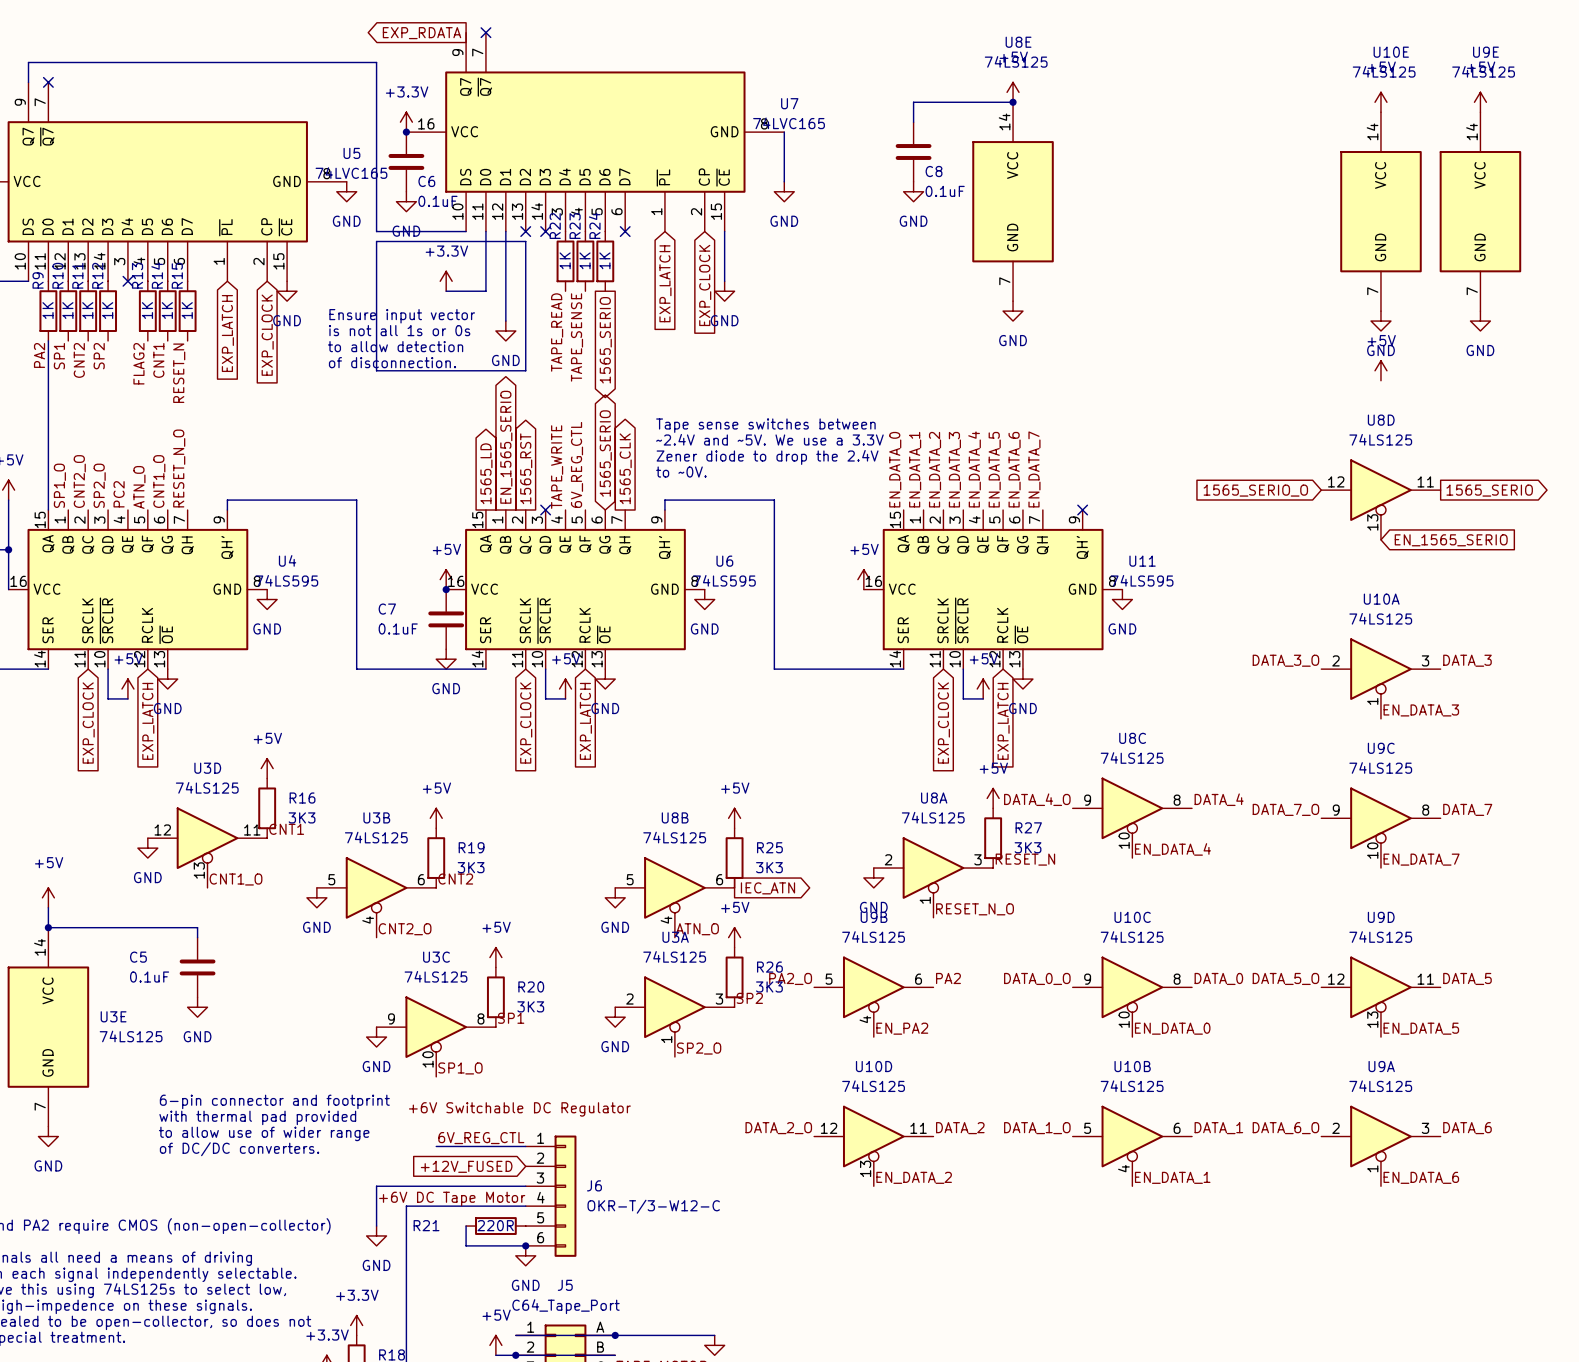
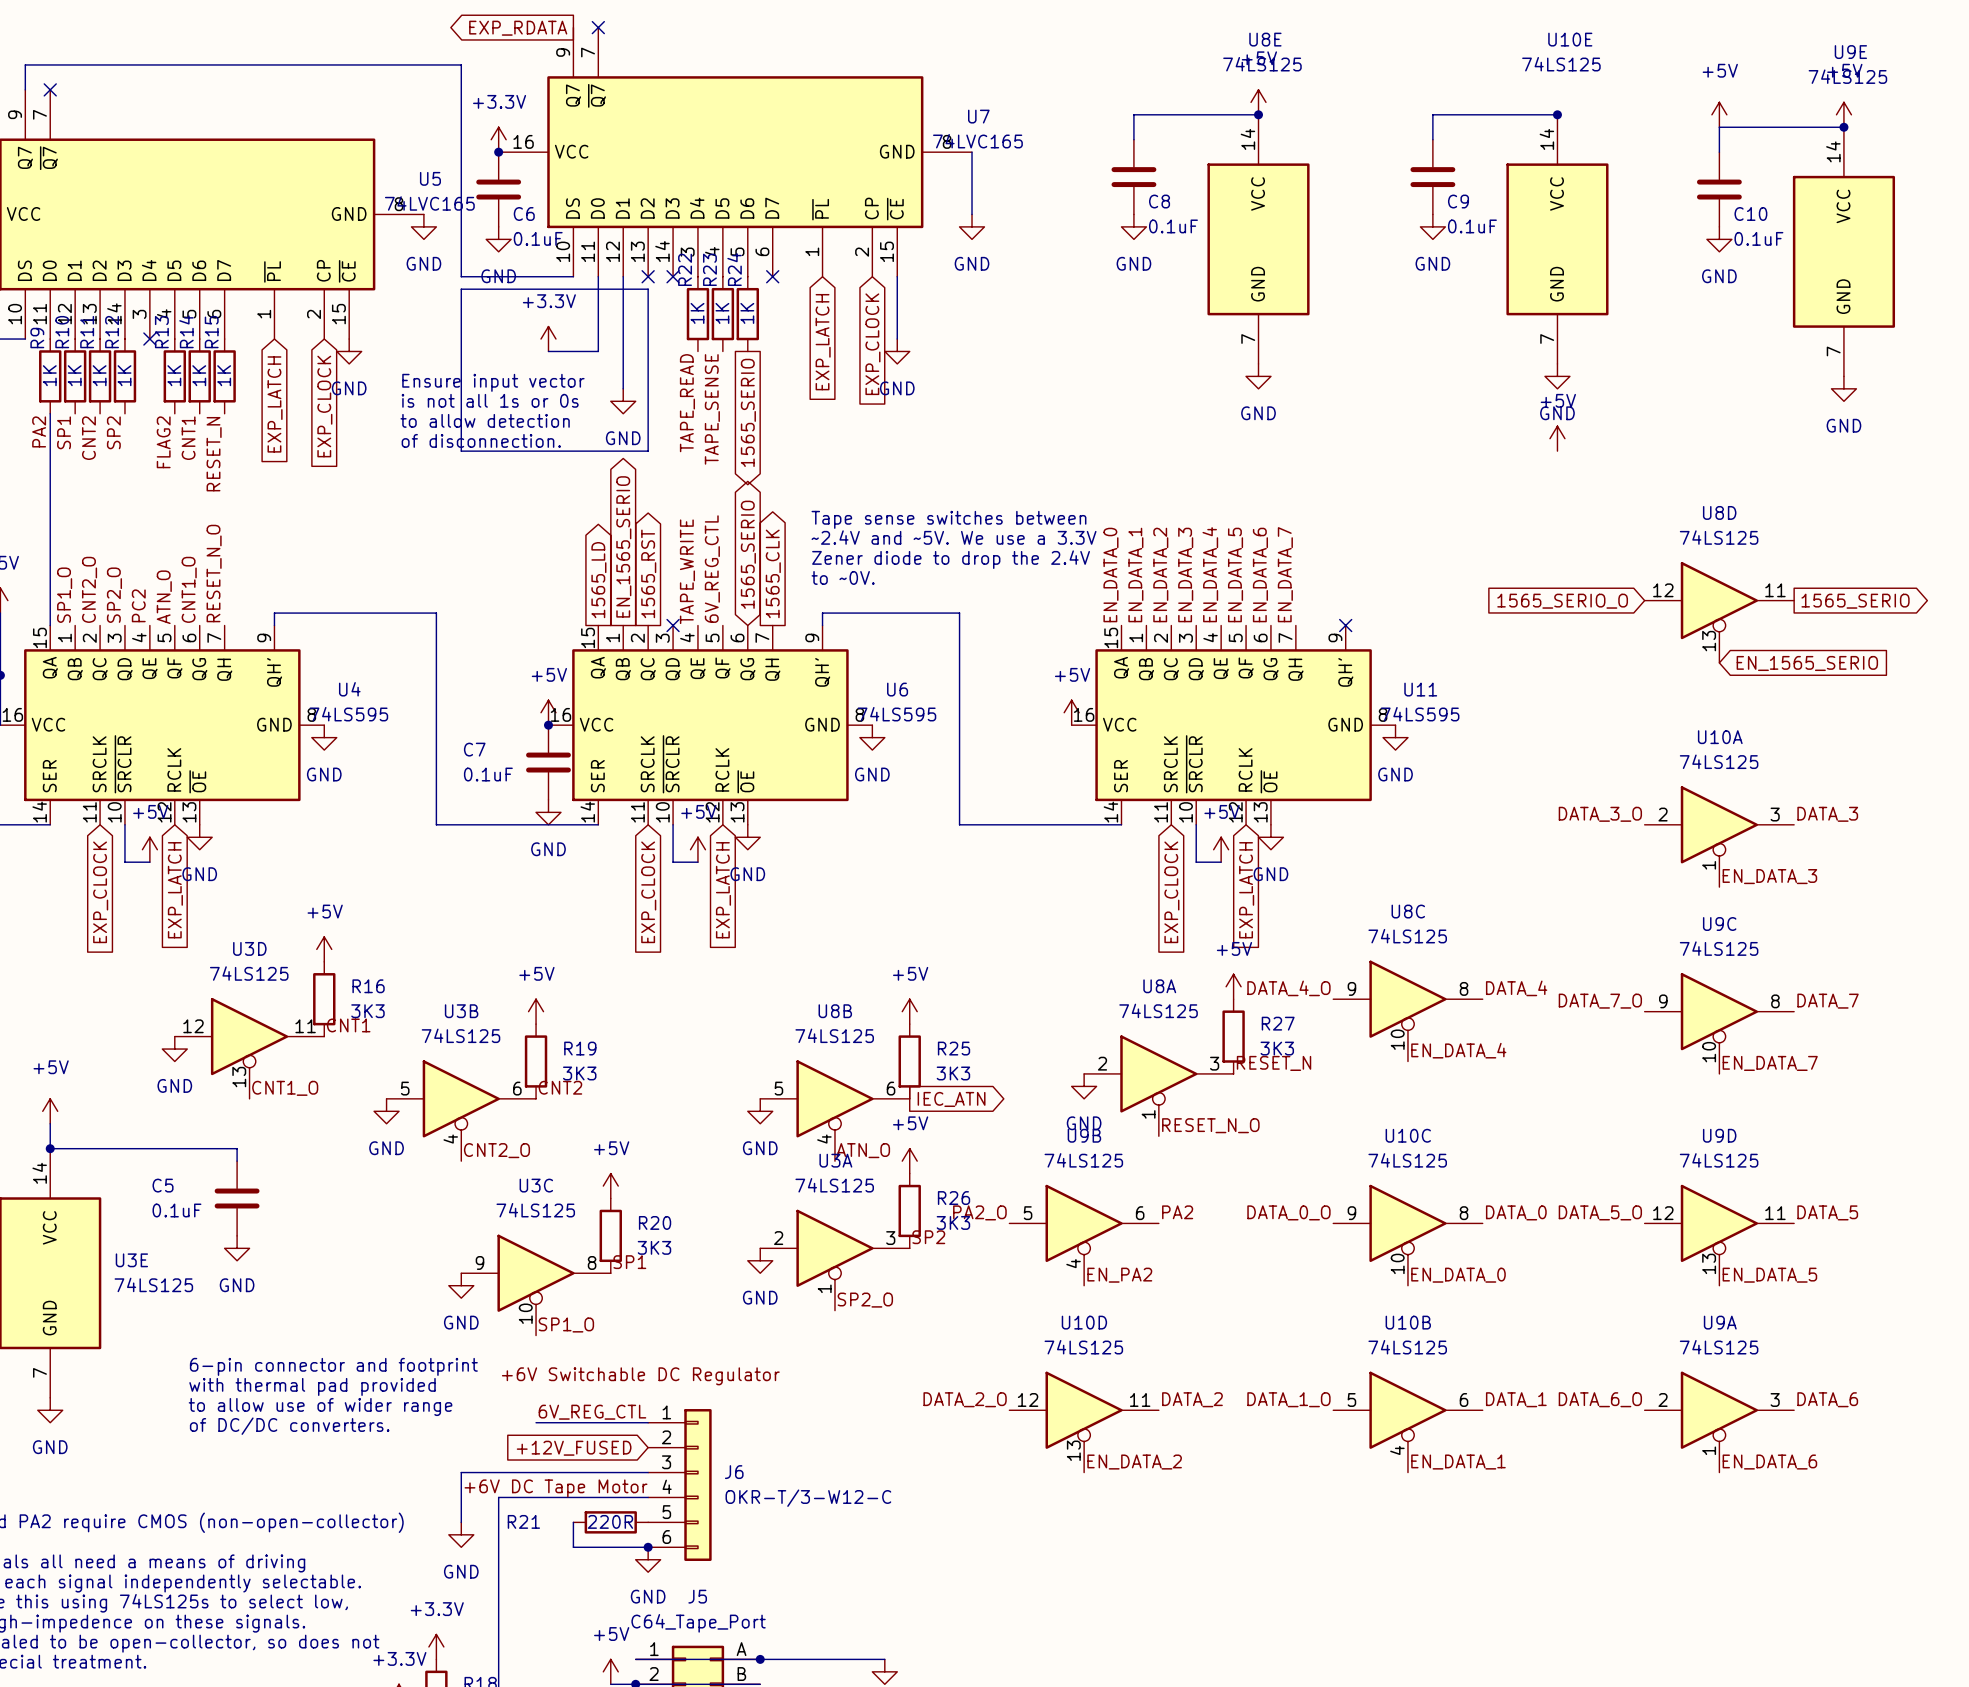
wire: none -> (1557, 114) (1432, 114) (1432, 139)
junction: none -> (1557, 114)
wire: none -> (1843, 127) (1719, 127) (1719, 152)
junction: none -> (1843, 127)
C9: none -> 0.1uF (1432, 177)
C10: none -> 0.1uF (1719, 189)
power symbol: none -> GND (1432, 226)
power symbol: none -> GND (1719, 239)
U10E position: (1380, 211) -> (1557, 239)
power symbol: none -> GND (1557, 376)
power symbol: GND (1380, 321) -> none
power symbol position: +5V (1380, 370) -> +5V (1557, 438)

